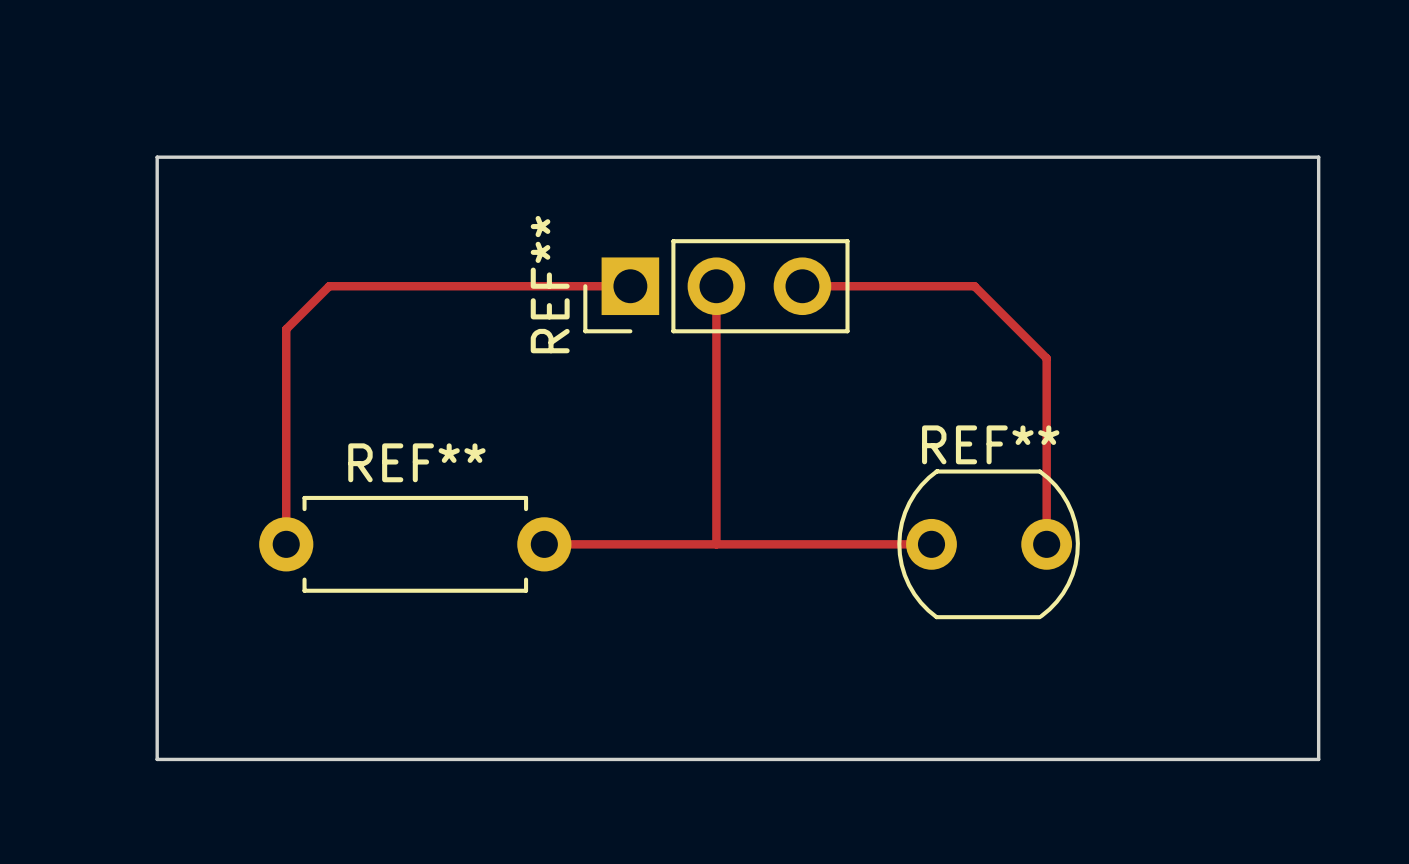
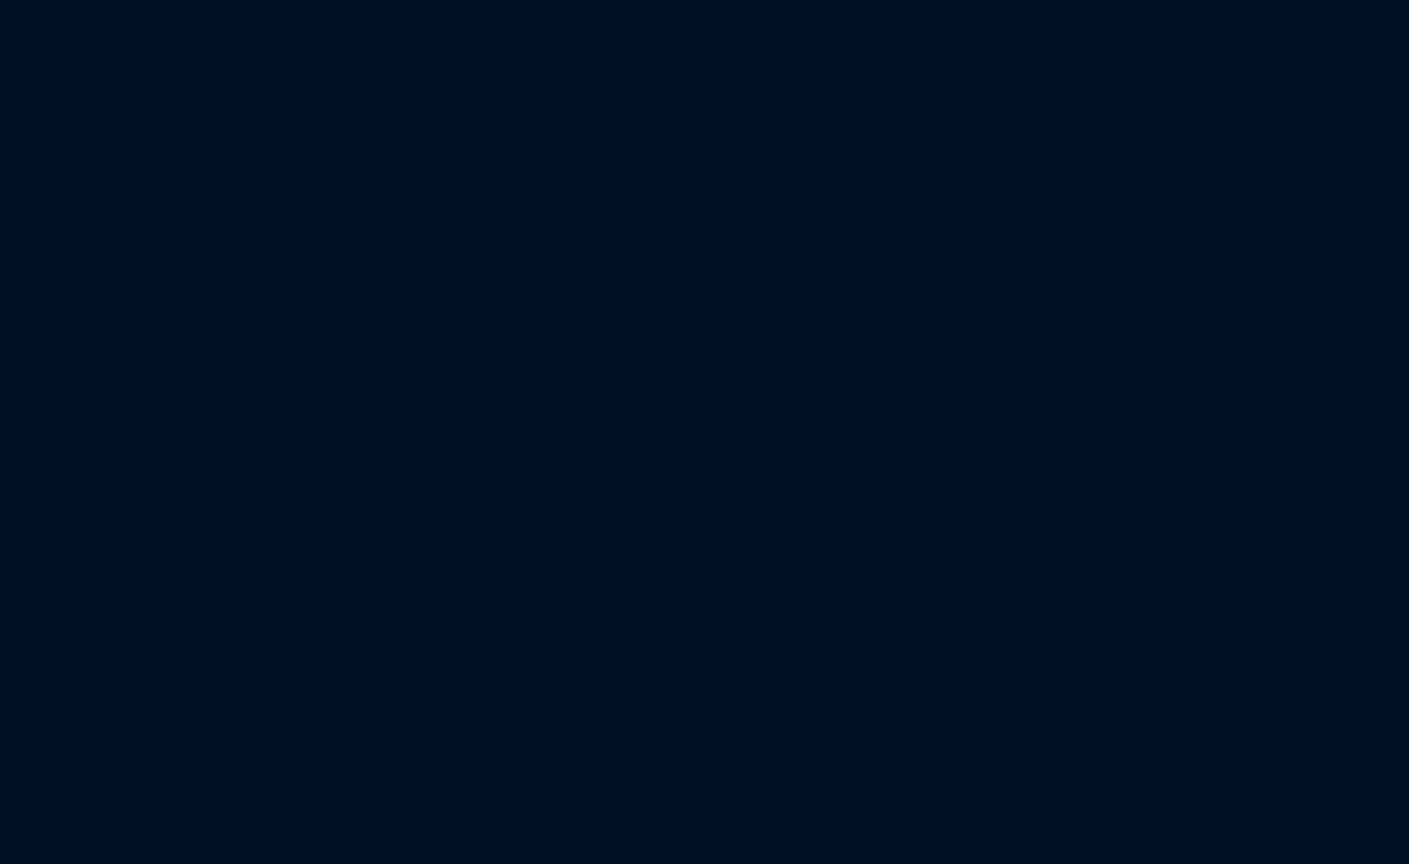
board edge: (157, 157) (157, 759) (1318, 759) (1318, 157) (157, 157) -> none
track: (630, 286) (329, 286) (286, 329) (286, 544) -> none
track: (716, 286) (716, 544) -> none
REF**: (716, 286) -> none
track: (802, 286) (974, 286) (1046, 358) (1046, 544) -> none
REF**: (415, 544) -> none
track: (544, 544) (931, 544) -> none
REF**: (988, 544) -> none

